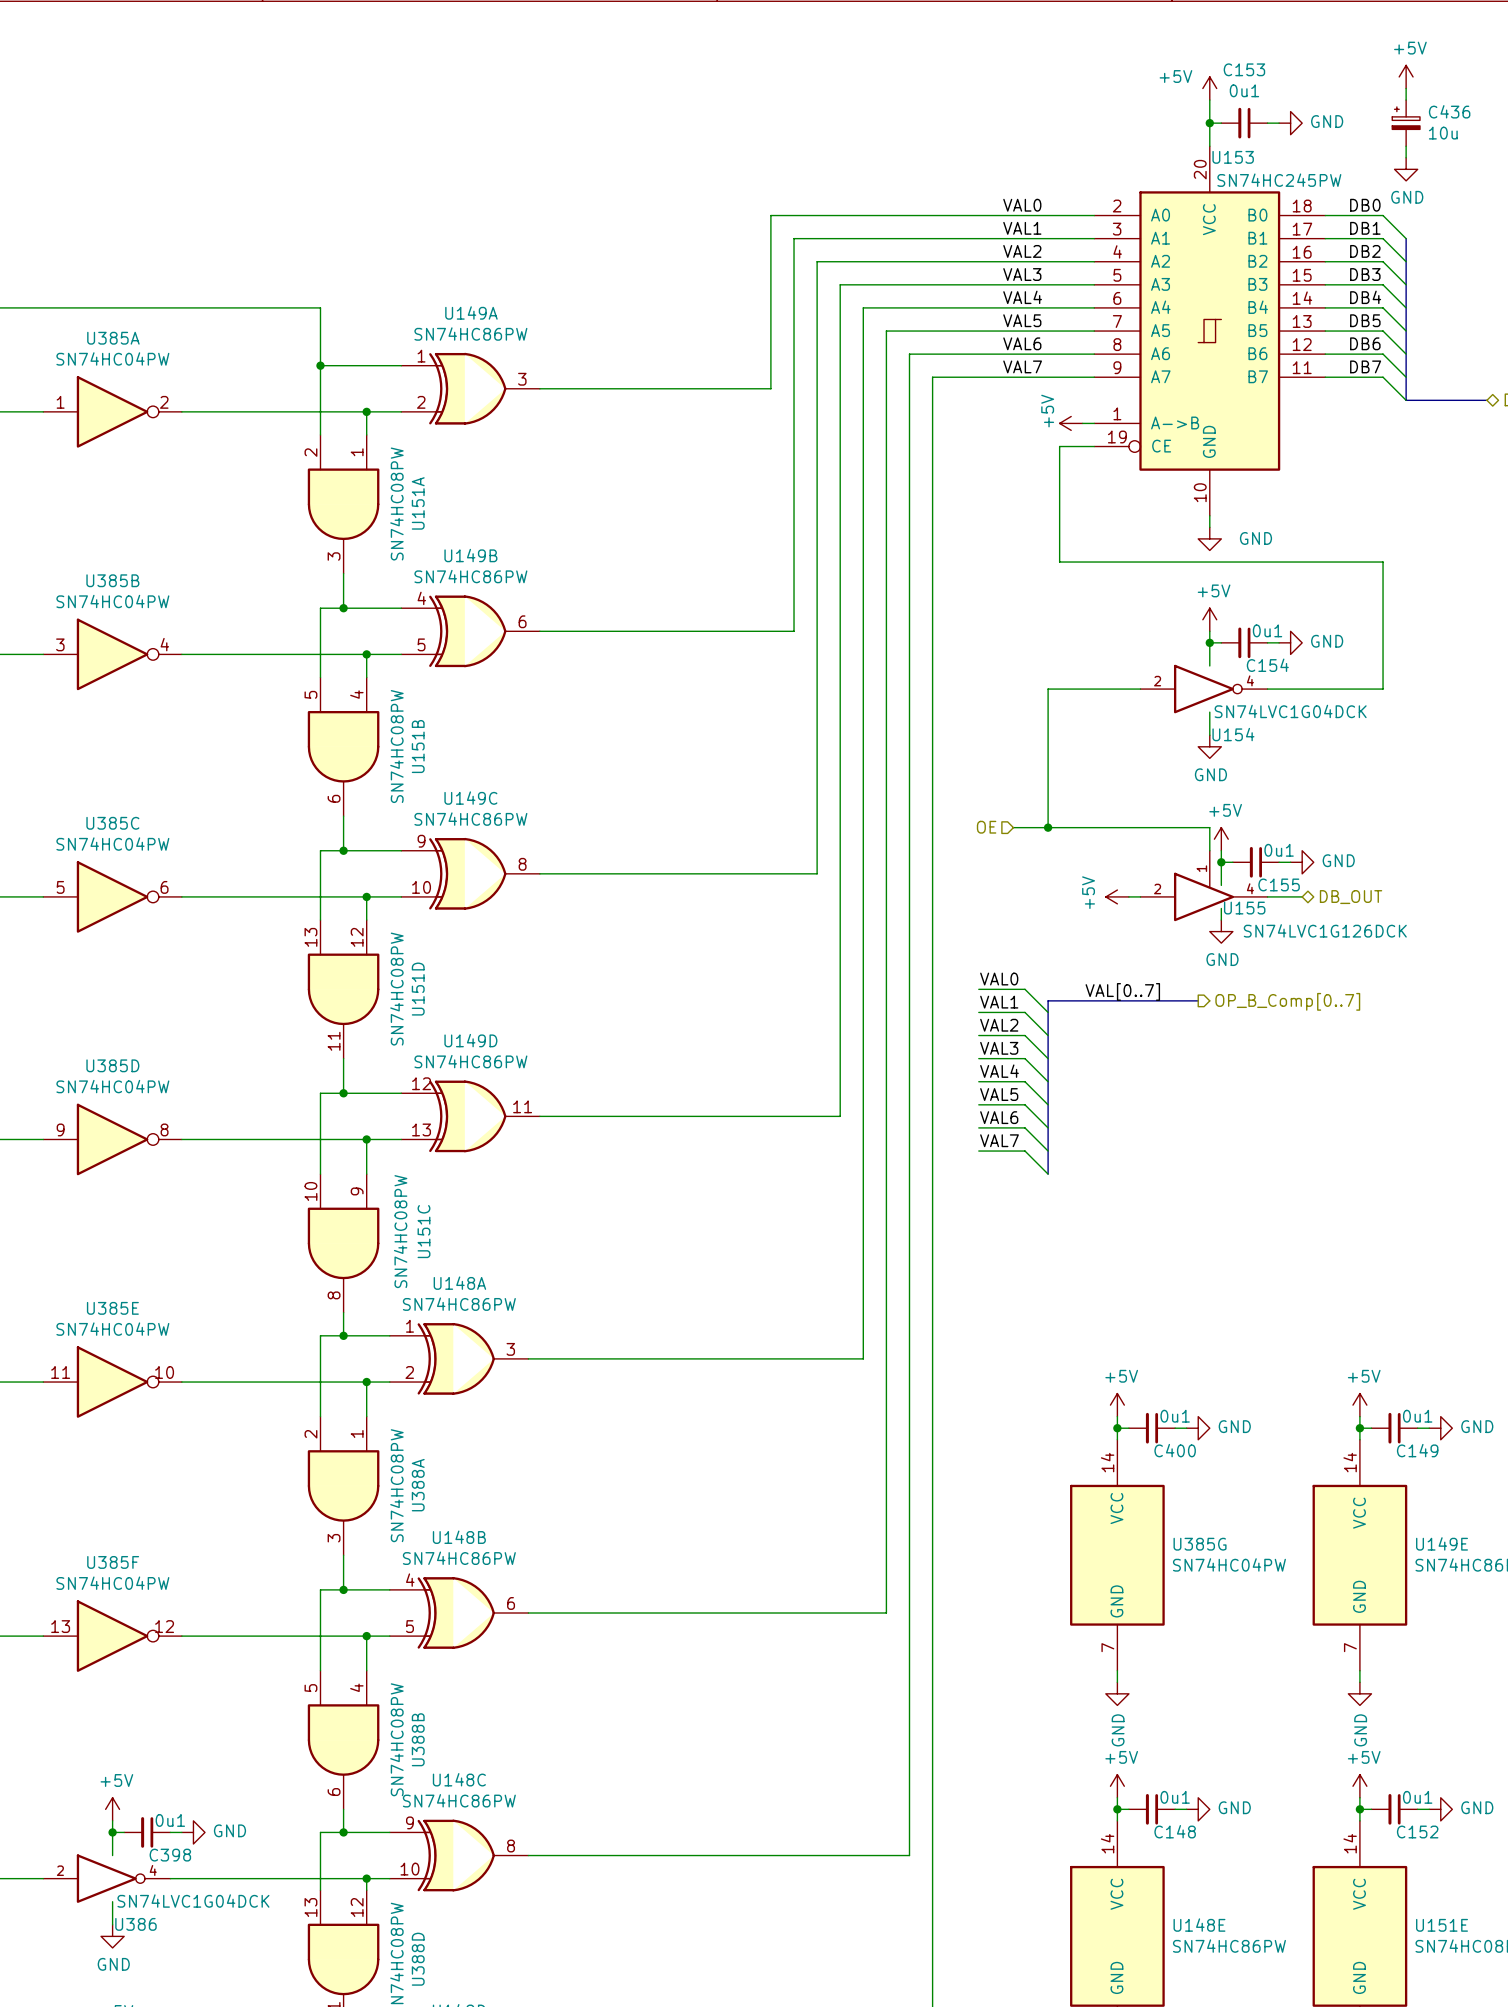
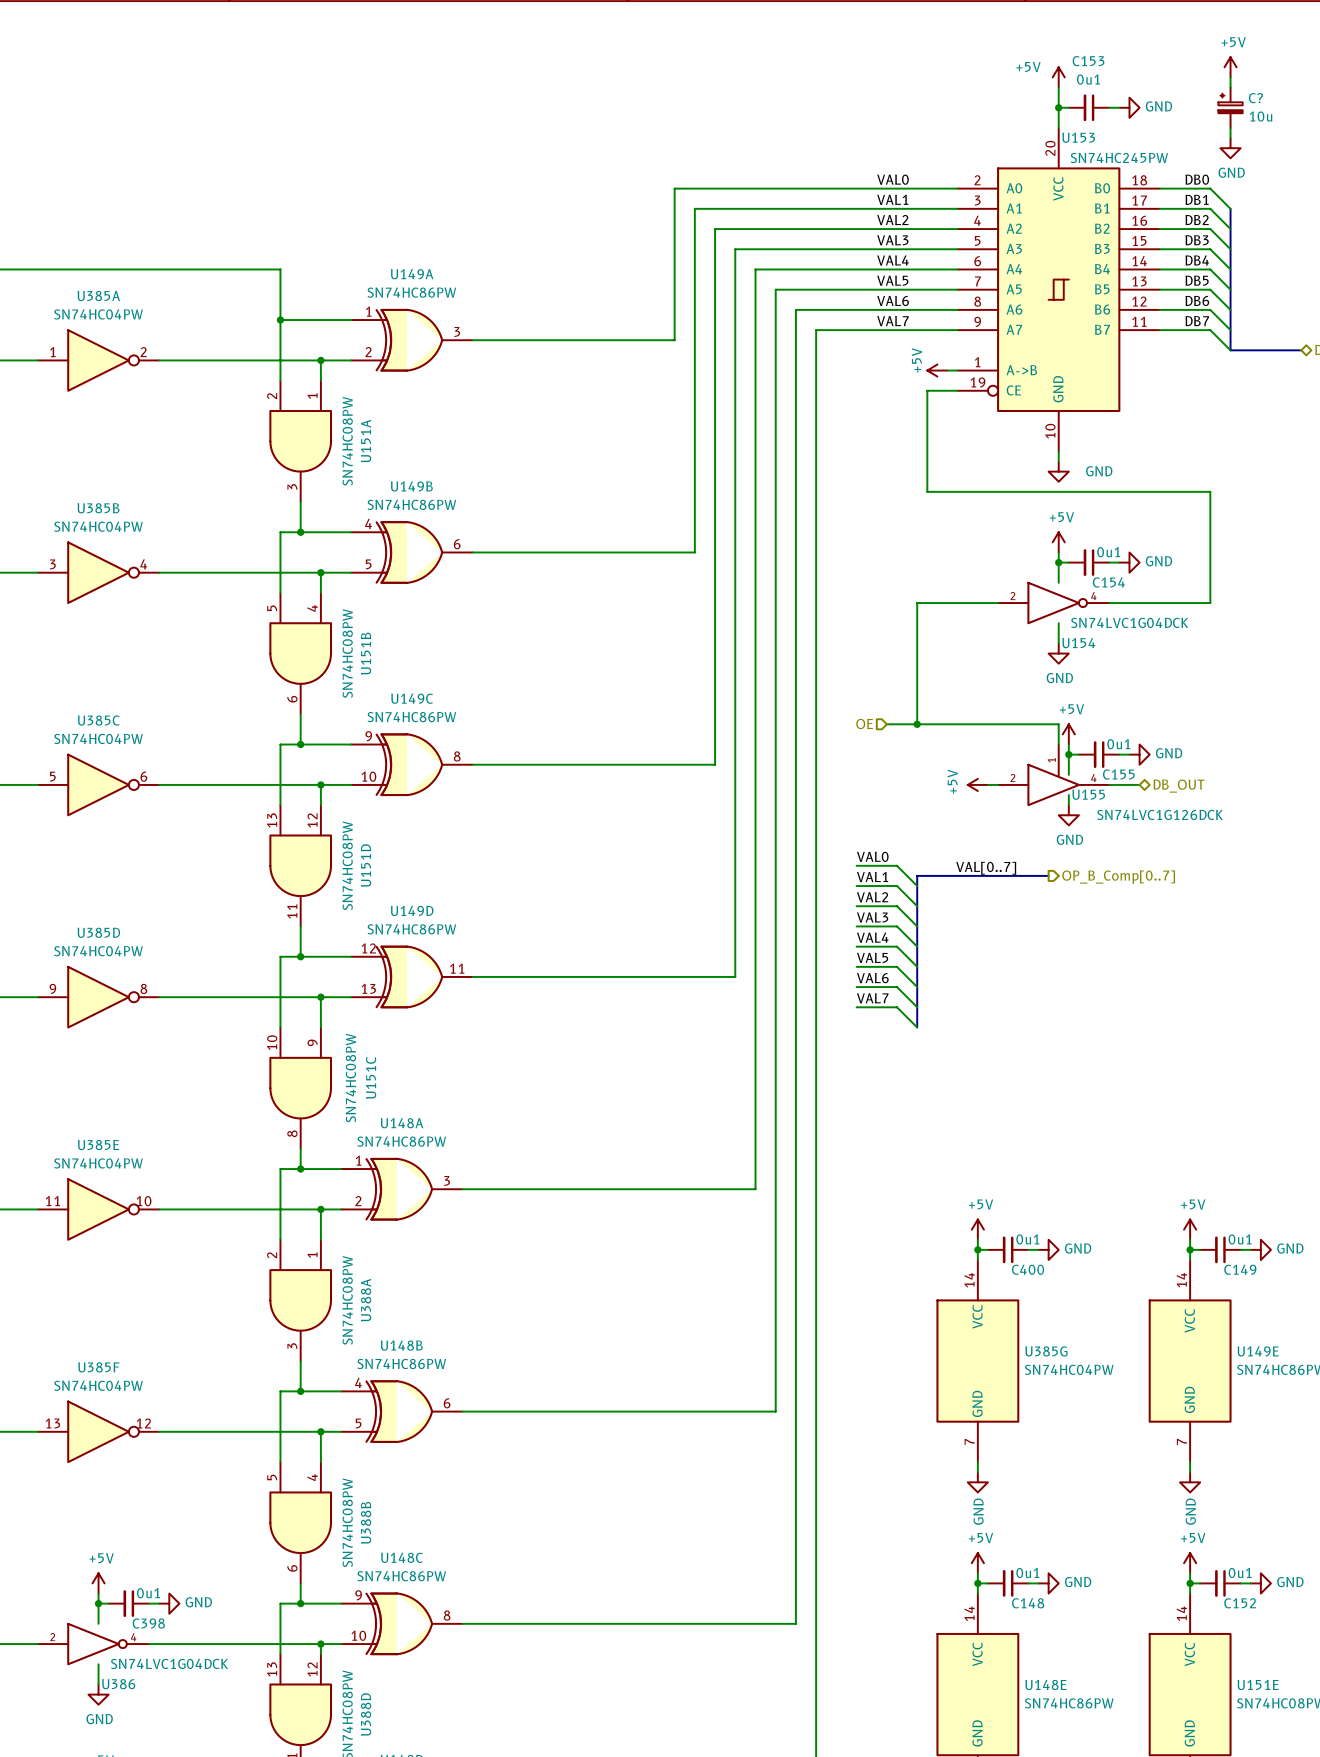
C436 name: C436 (1449, 111) -> C? (1255, 98)

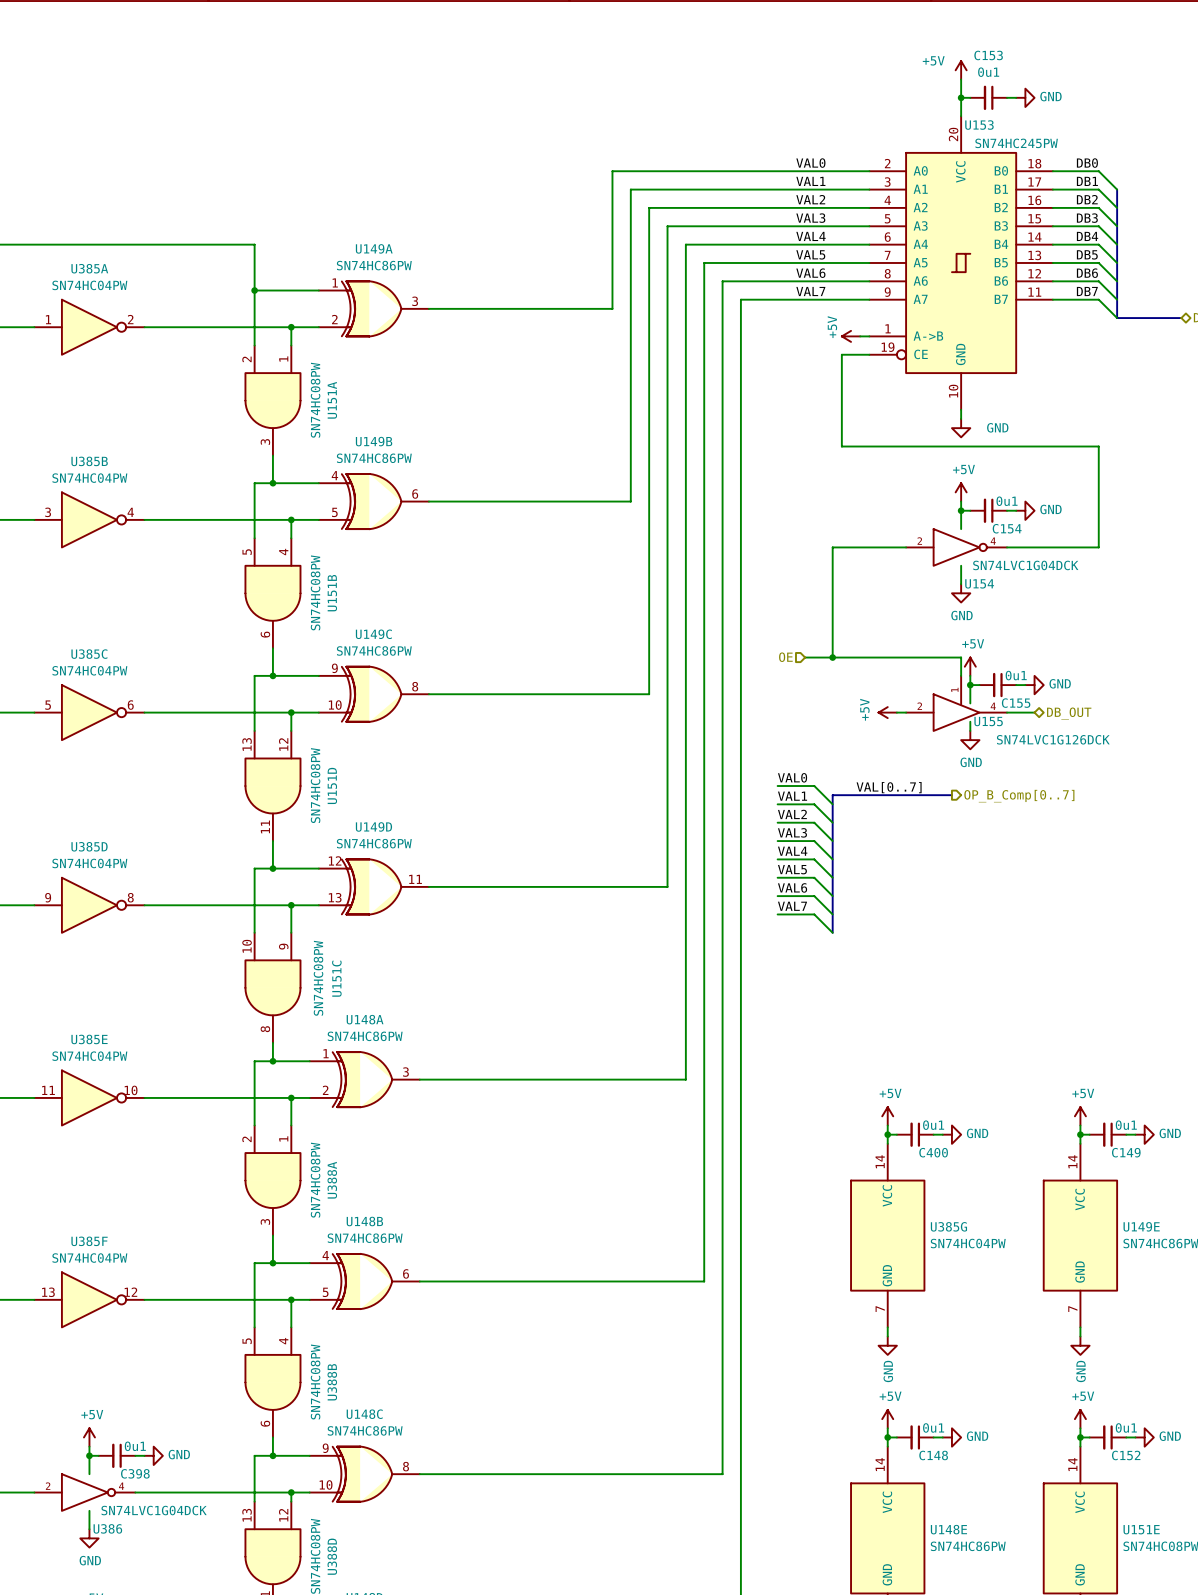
power symbol: +5V (1230, 67) -> none
wire: (1230, 77) (1230, 87) -> none
C?: 10u (1230, 107) -> none
wire: (1230, 127) (1230, 138) -> none
power symbol: GND (1230, 148) -> none

